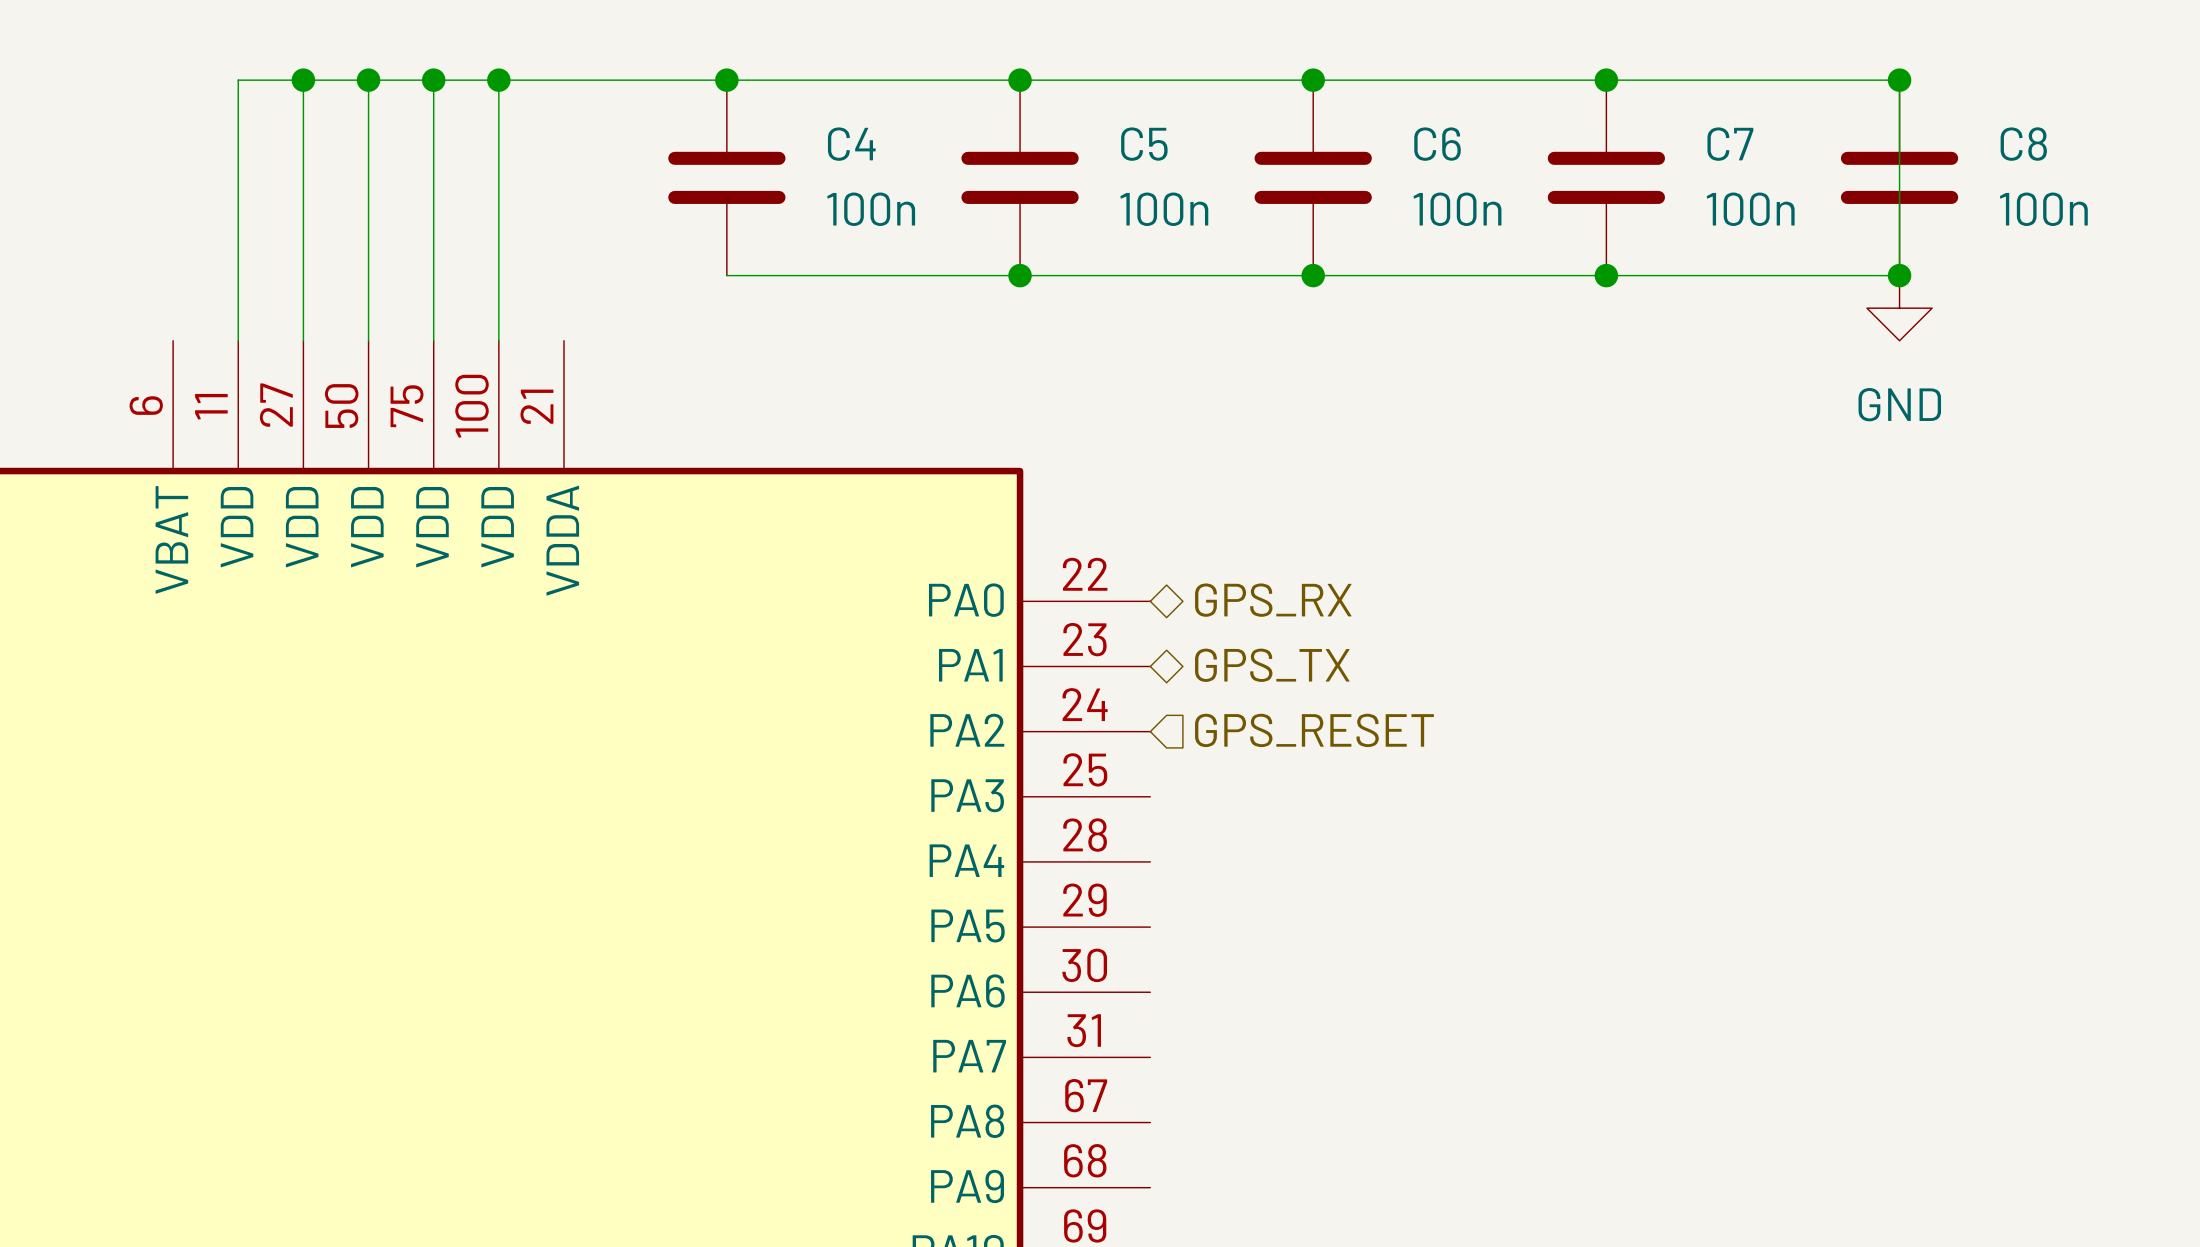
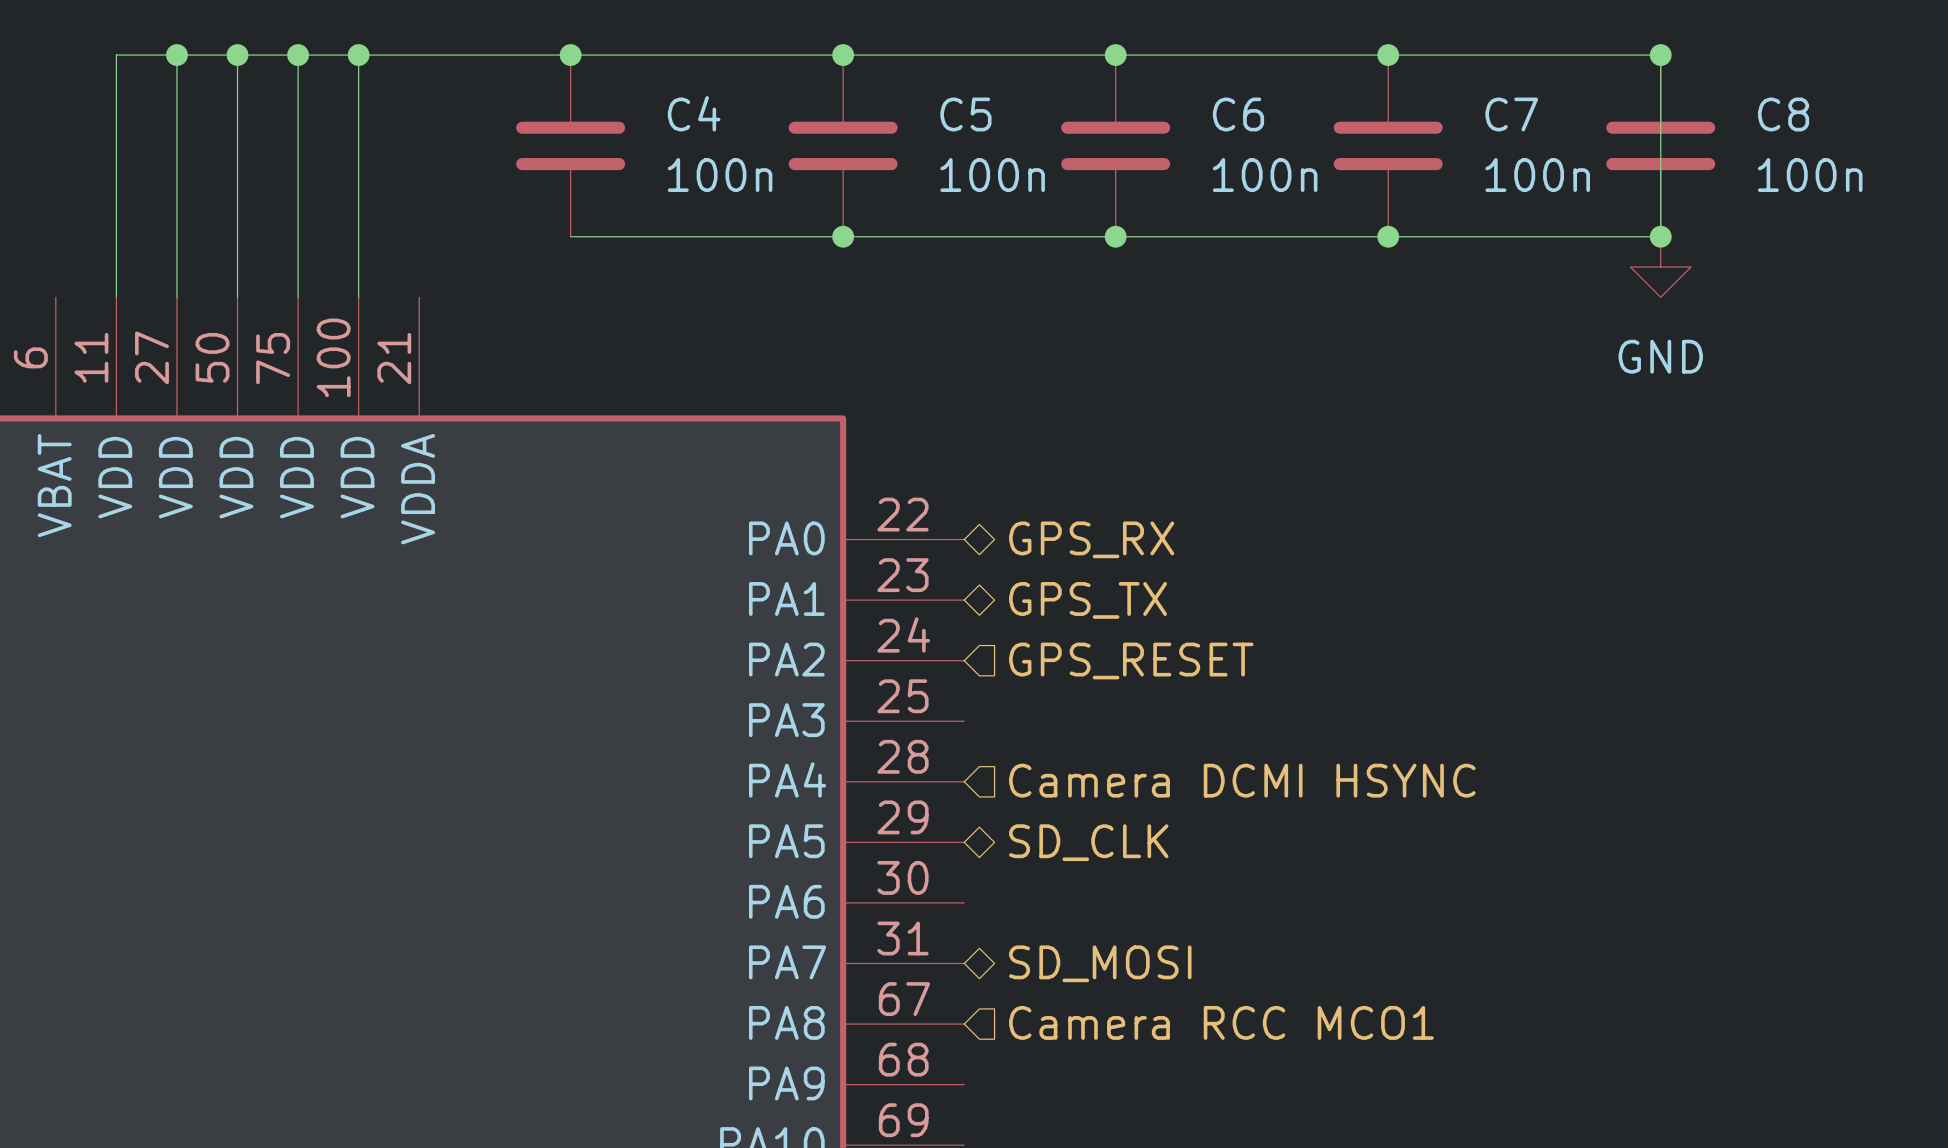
hierarchical label: none -> Camera DCMI HSYNC (1242, 780)
hierarchical label: none -> SD_CLK (1088, 842)
hierarchical label: none -> SD_MOSI (1100, 963)
hierarchical label: none -> Camera RCC MCO1 (1221, 1022)

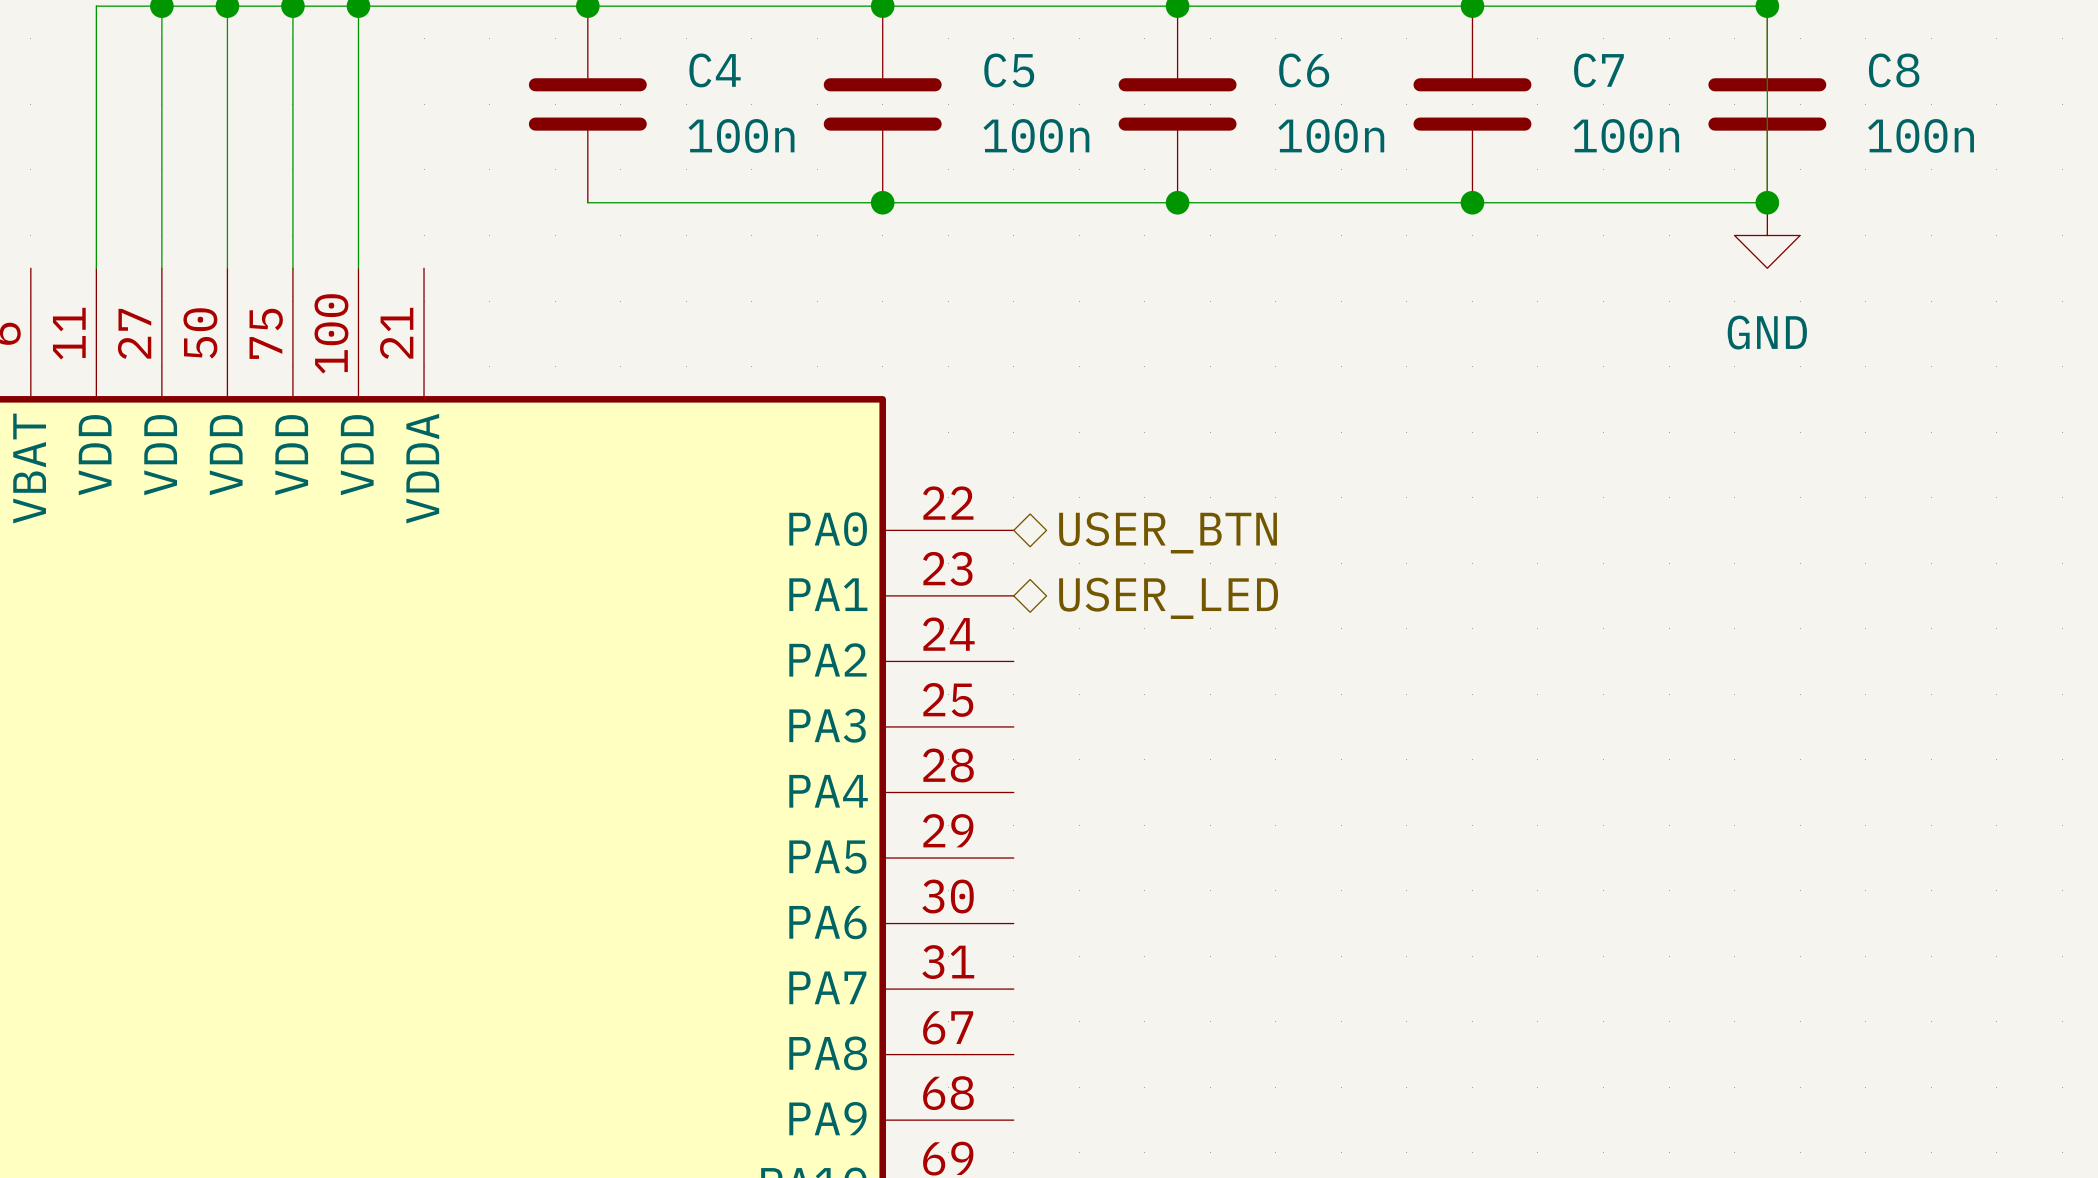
hierarchical label: GPS_RX (1091, 539) -> USER_BTN (1168, 532)
hierarchical label: GPS_TX (1088, 600) -> USER_LED (1168, 598)
hierarchical label: GPS_RESET (1131, 660) -> none
hierarchical label: Camera DCMI HSYNC (1242, 780) -> none
hierarchical label: SD_CLK (1088, 842) -> none
hierarchical label: SD_MOSI (1100, 963) -> none
hierarchical label: Camera RCC MCO1 (1221, 1022) -> none

